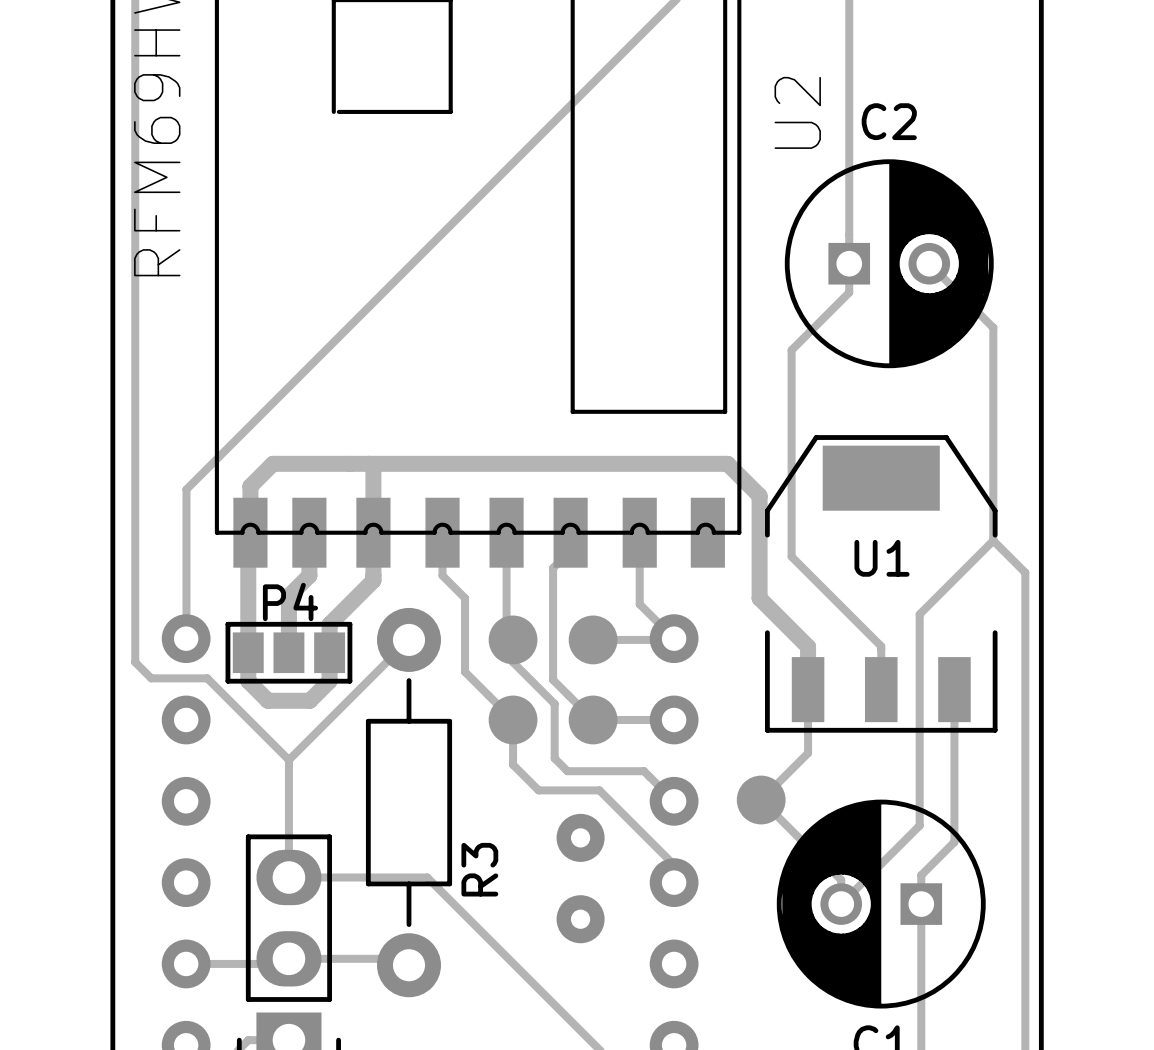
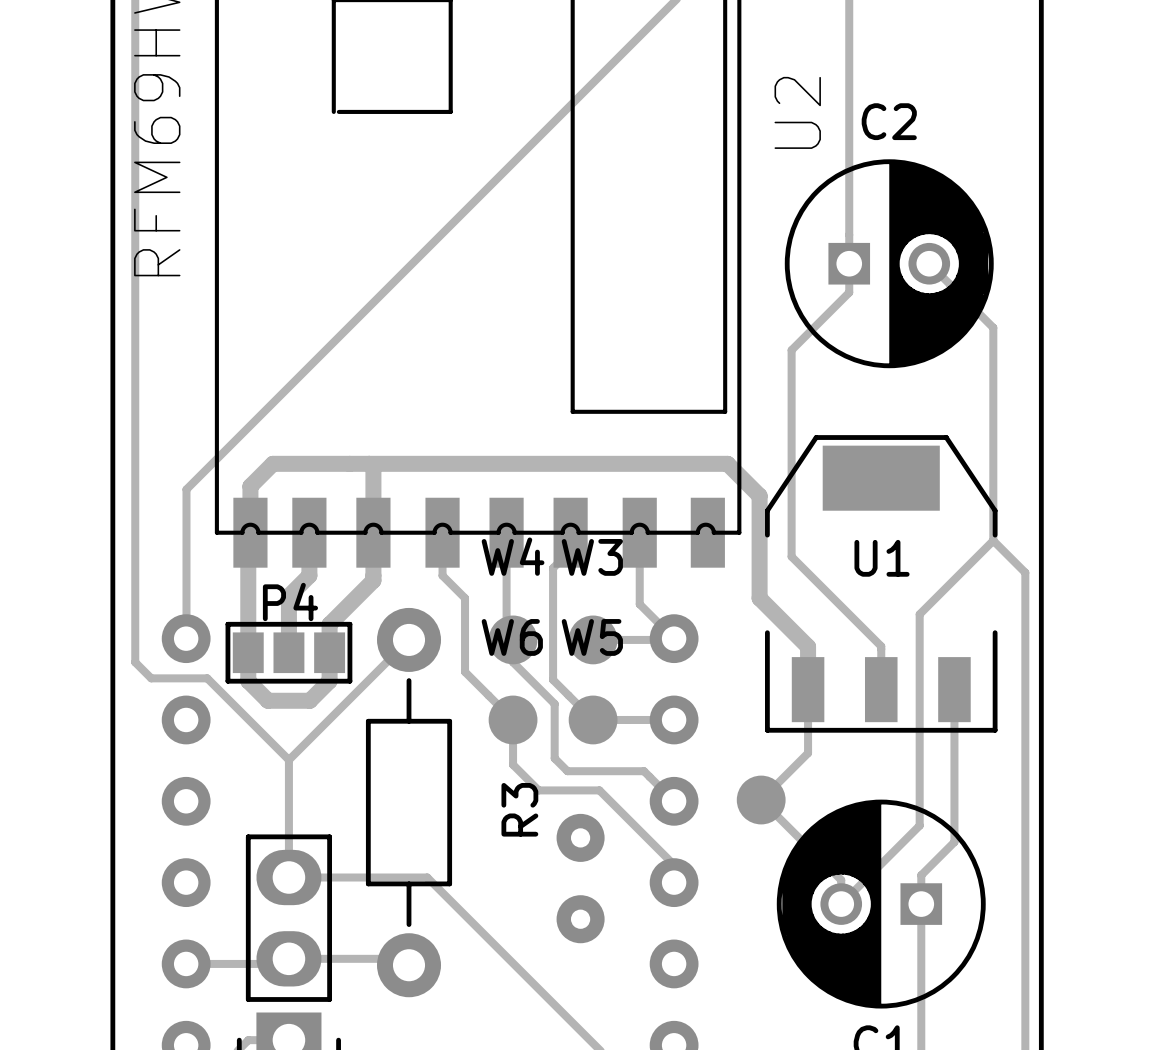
W4 name: none -> W4 (513, 556)
W3 name: none -> W3 (592, 557)
W6 name: none -> W6 (512, 637)
W5 name: none -> W5 (592, 637)
R3 name position: R3 (479, 869) -> R3 (519, 809)

